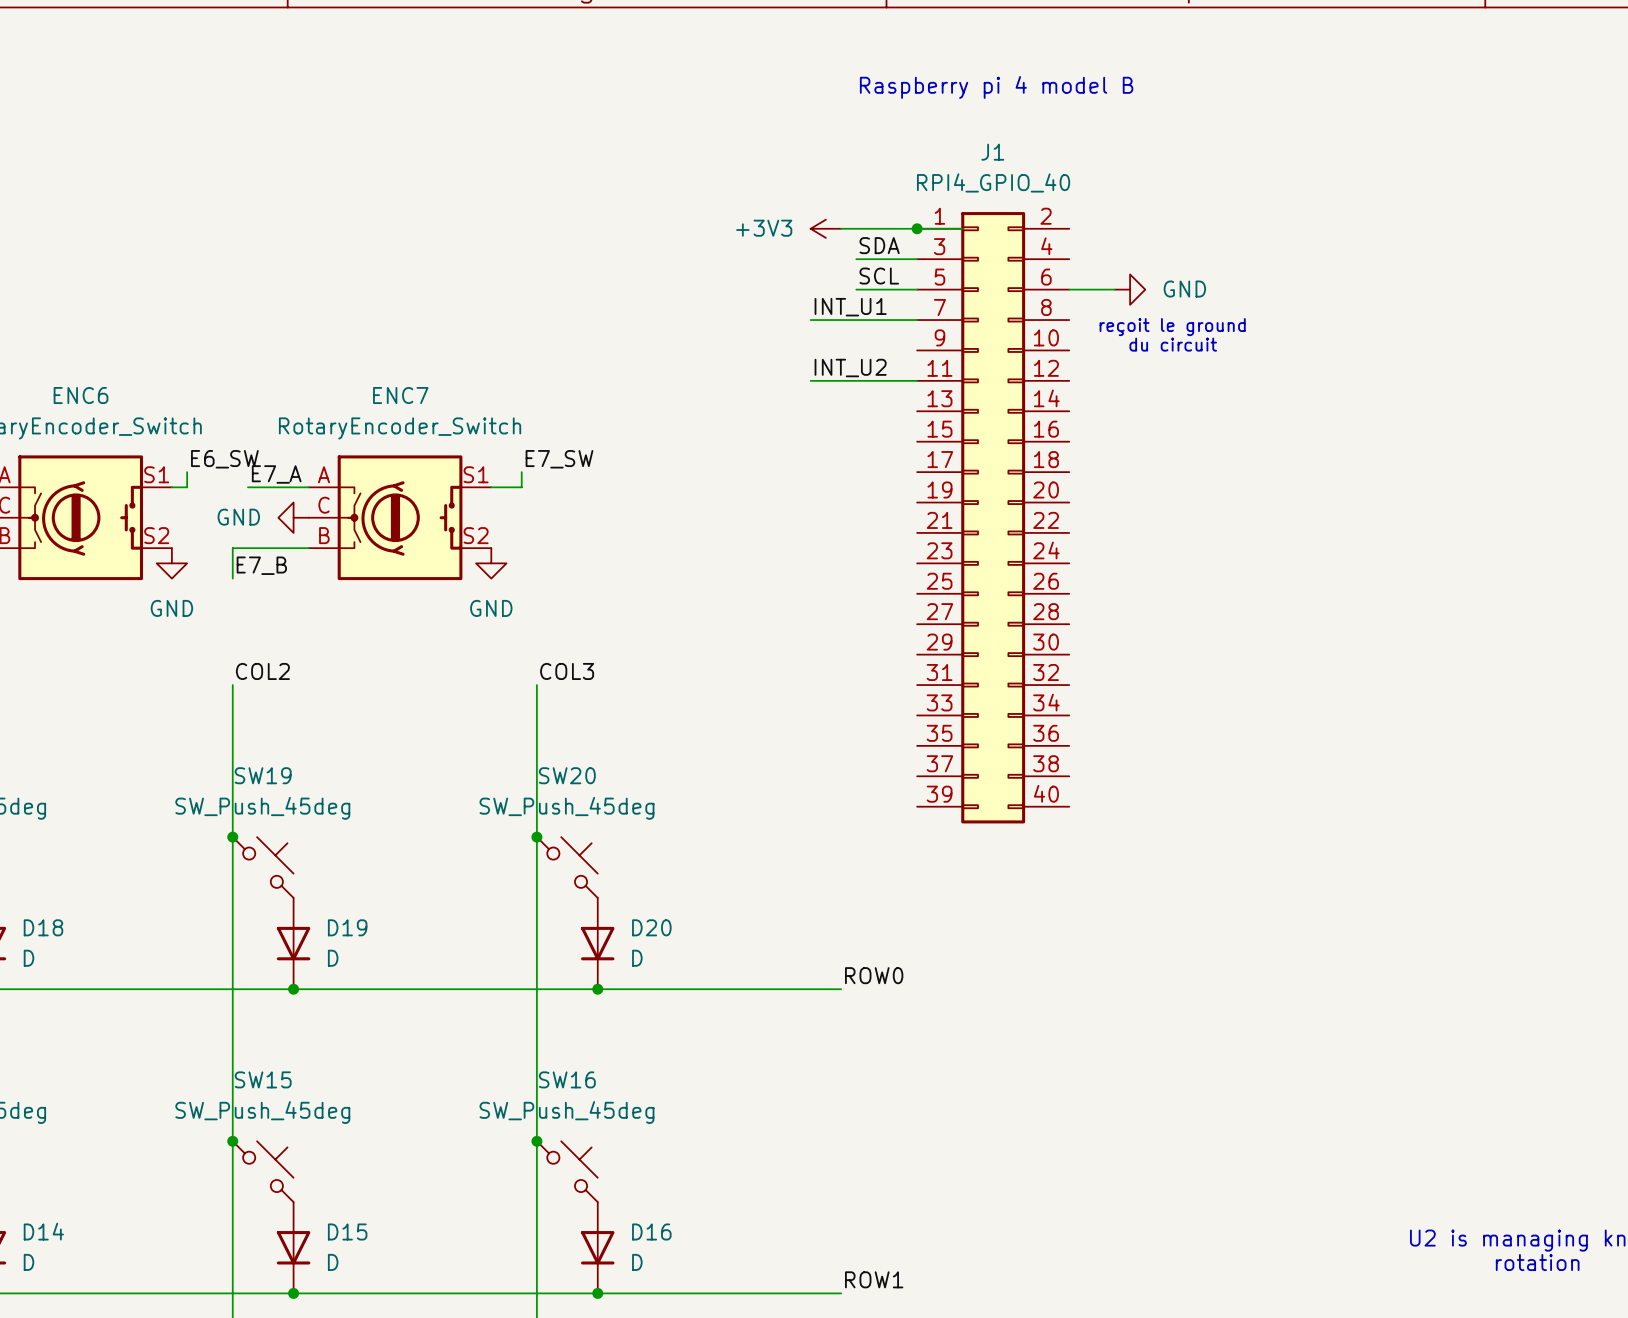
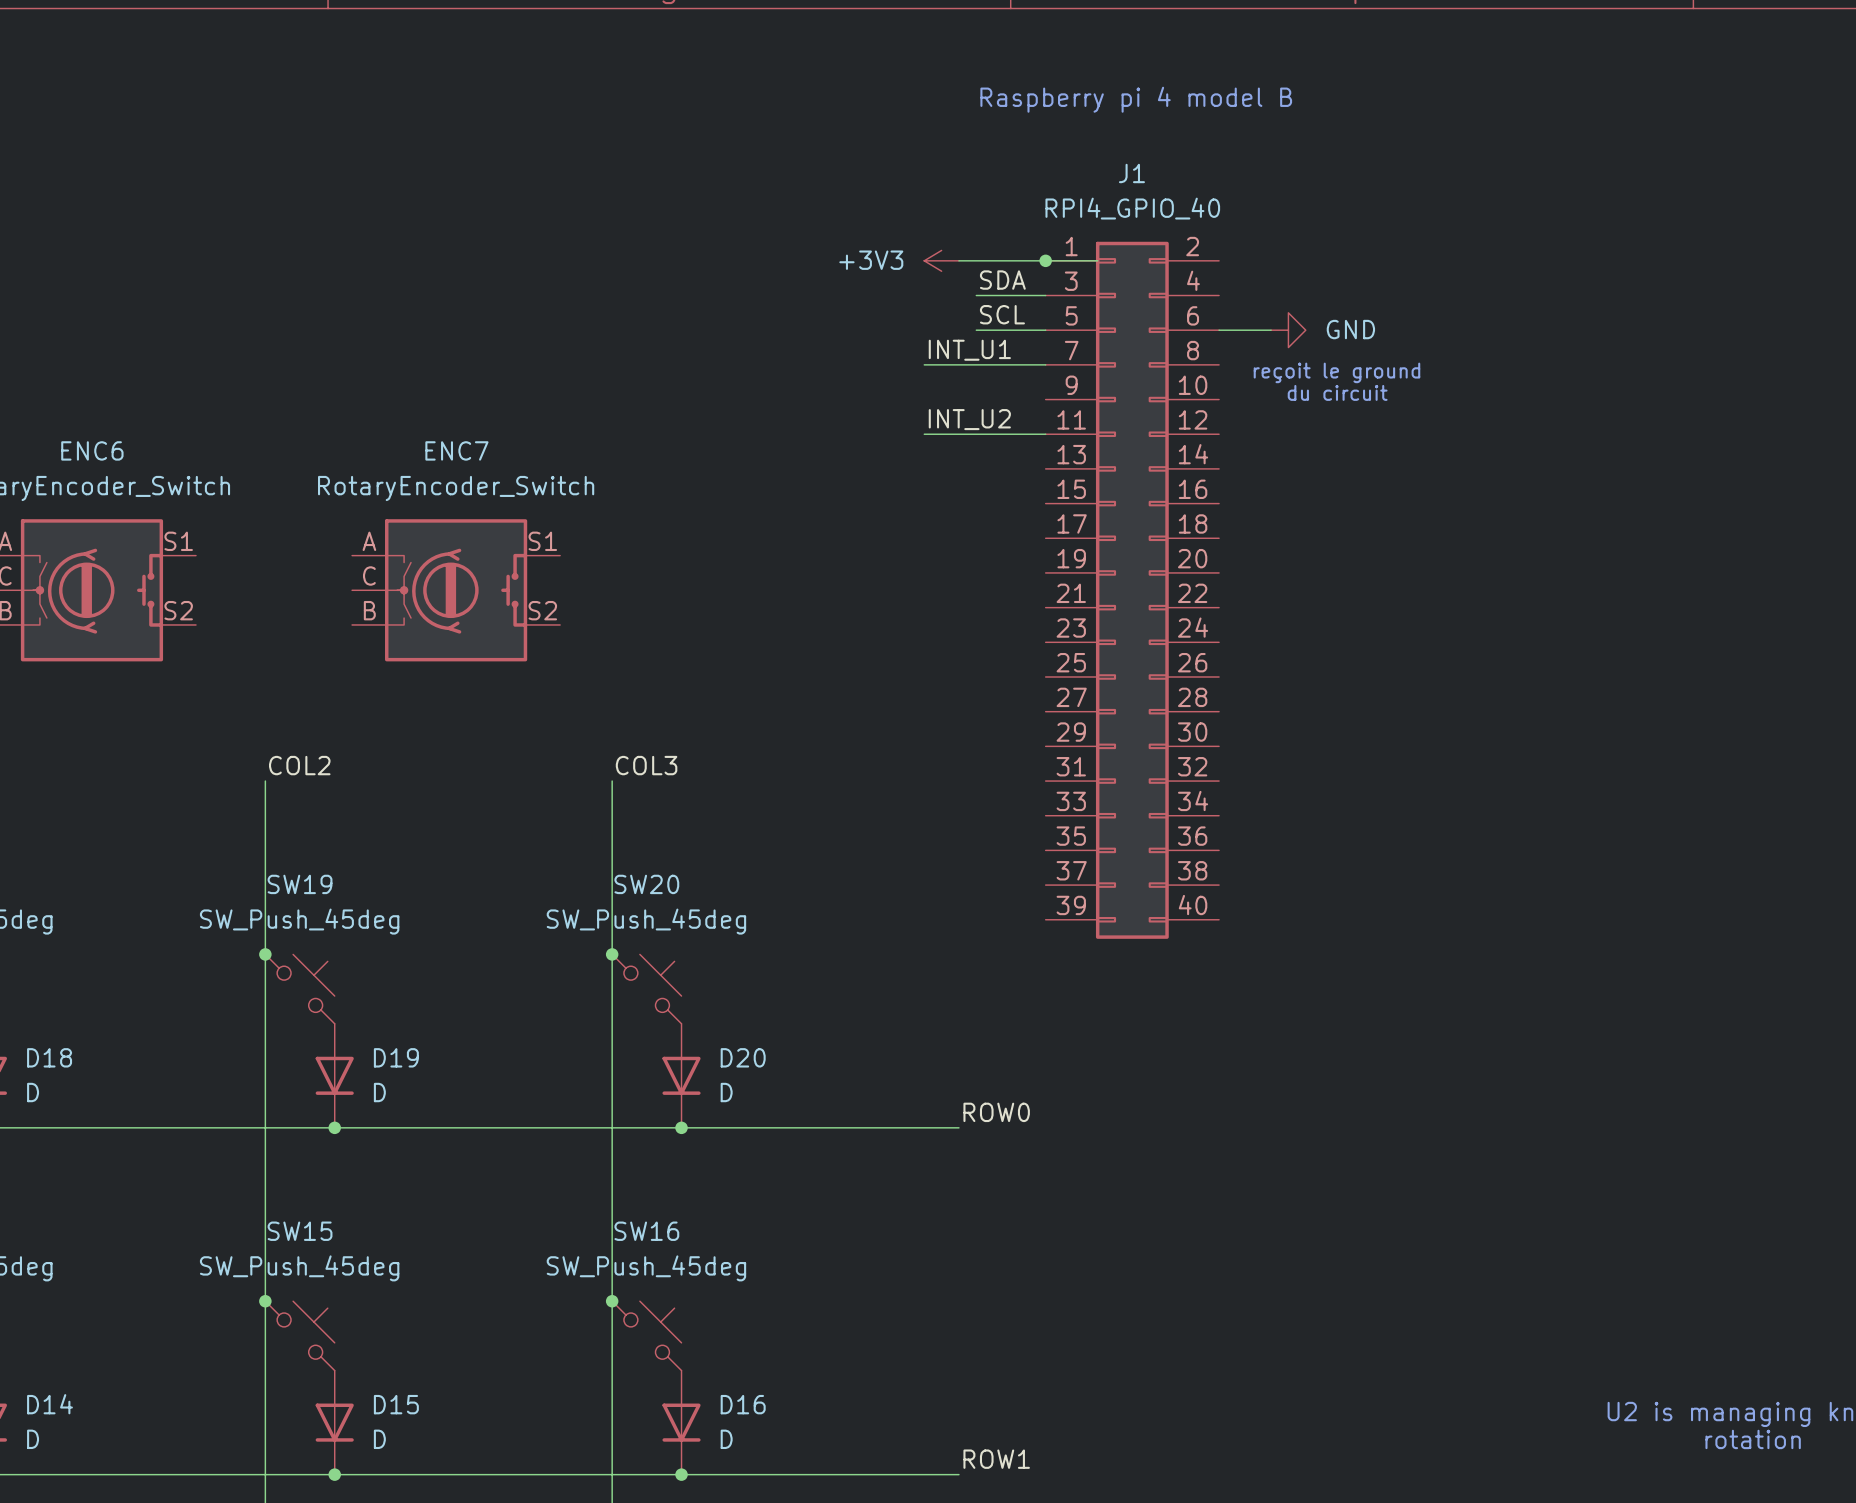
label: E6_SW (224, 459) -> none
label: E7_SW (559, 459) -> none
wire: (187, 472) (187, 487) (171, 487) -> none
wire: (521, 472) (521, 487) (491, 487) -> none
label: E7_A (276, 474) -> none
wire: (247, 487) (308, 487) -> none
power symbol: GND (293, 517) -> none
wire: (308, 548) (232, 548) (232, 578) -> none
power symbol: GND (171, 563) -> none
power symbol: GND (491, 563) -> none
label: E7_B (261, 565) -> none

